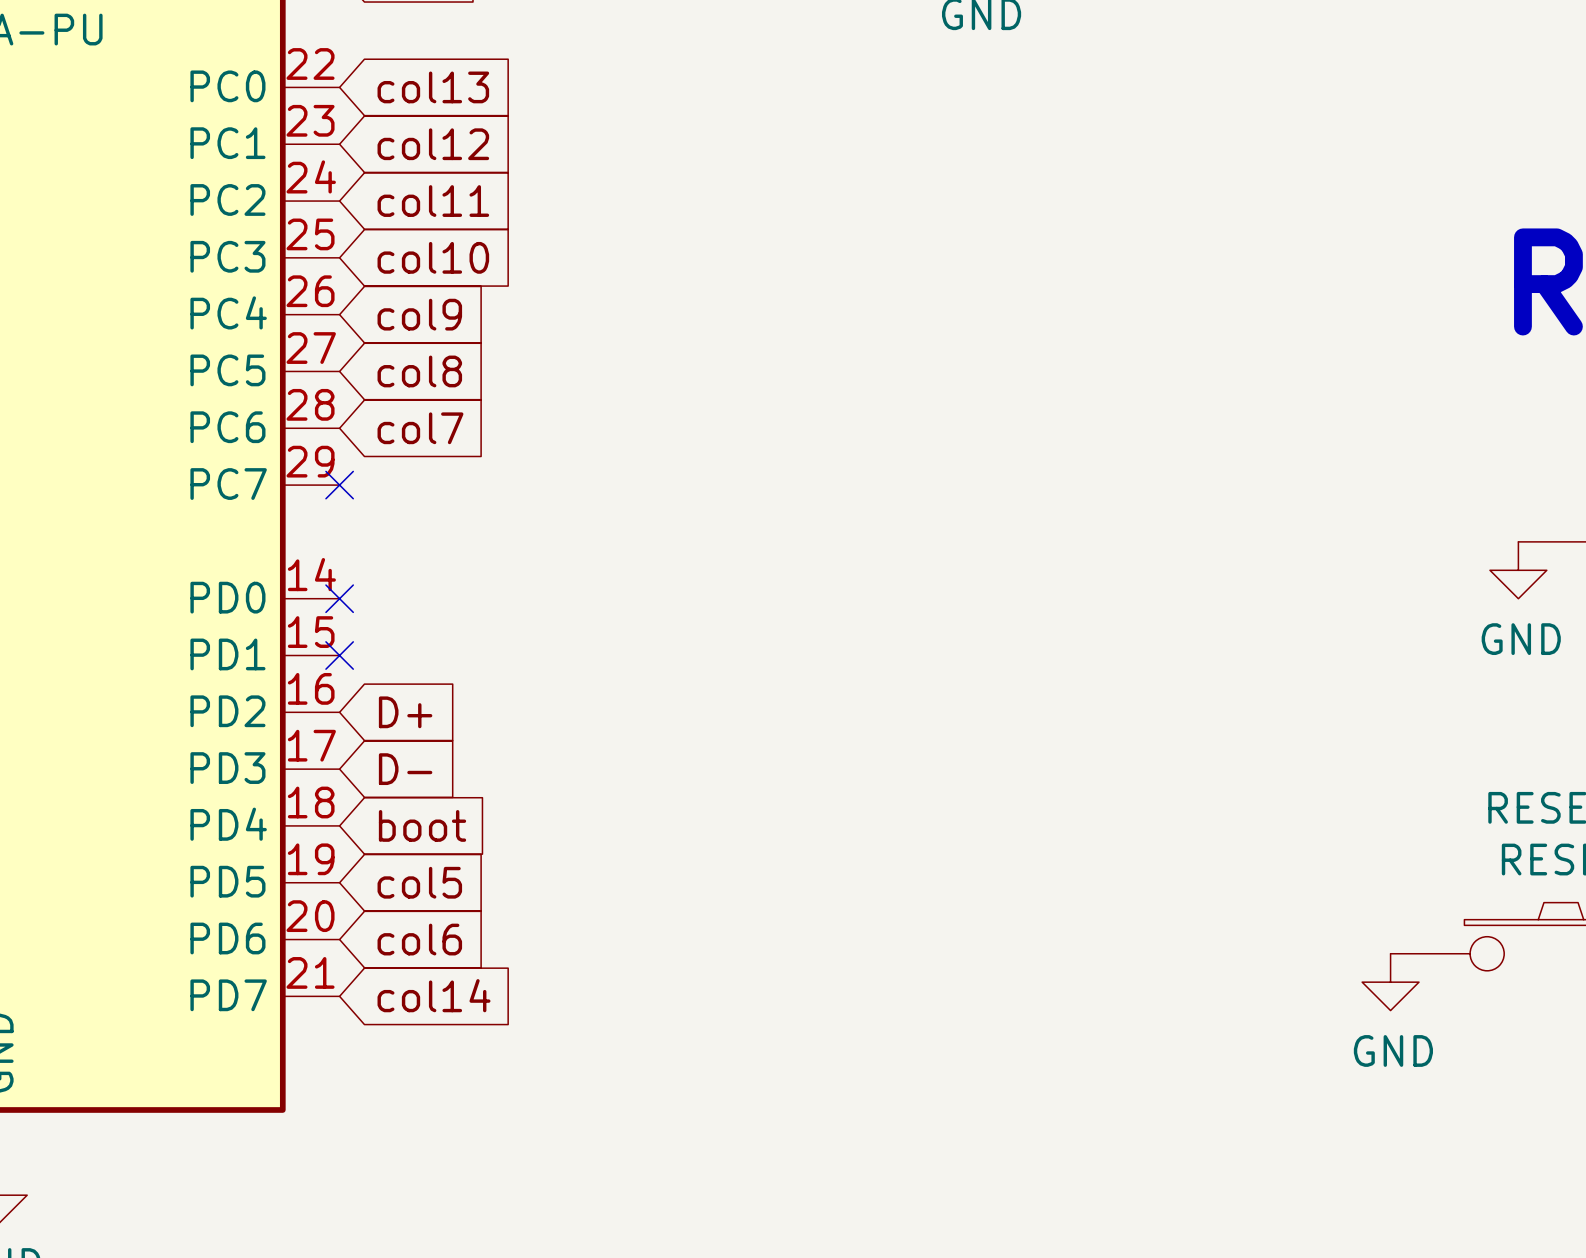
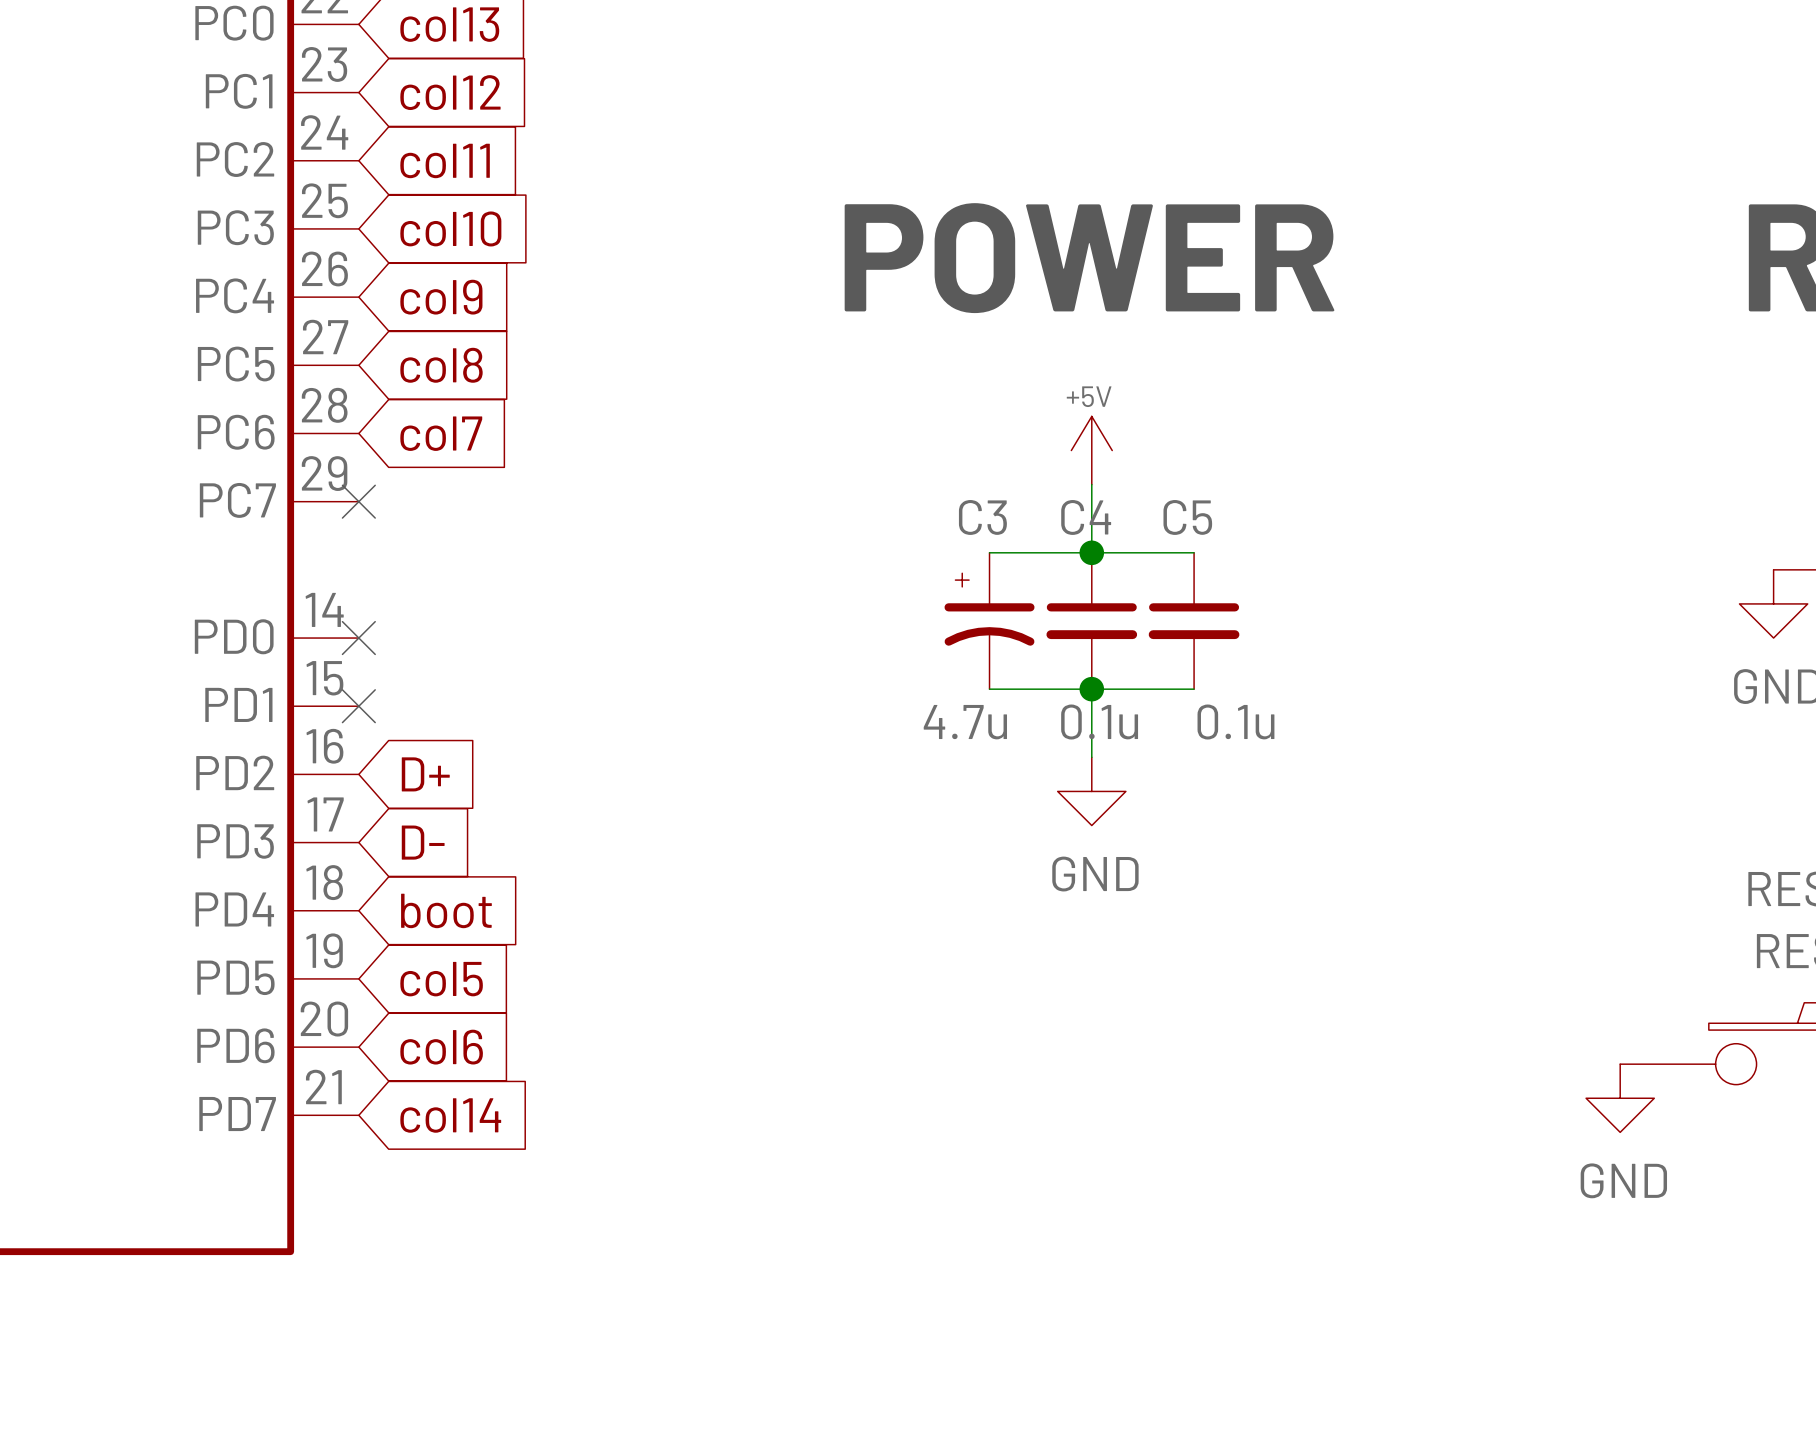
text: none -> POWER (1089, 258)
power symbol: none -> +5V (1091, 450)
wire: none -> (1091, 484) (1091, 552)
wire: none -> (989, 552) (1194, 552)
junction: none -> (1091, 552)
C3: none -> 4.7u (989, 620)
C4: none -> 0.1u (1091, 620)
C5: none -> 0.1u (1194, 620)
wire: none -> (989, 689) (1194, 689)
wire: none -> (1091, 689) (1091, 757)
junction: none -> (1091, 689)
power symbol: none -> GND (1091, 791)

